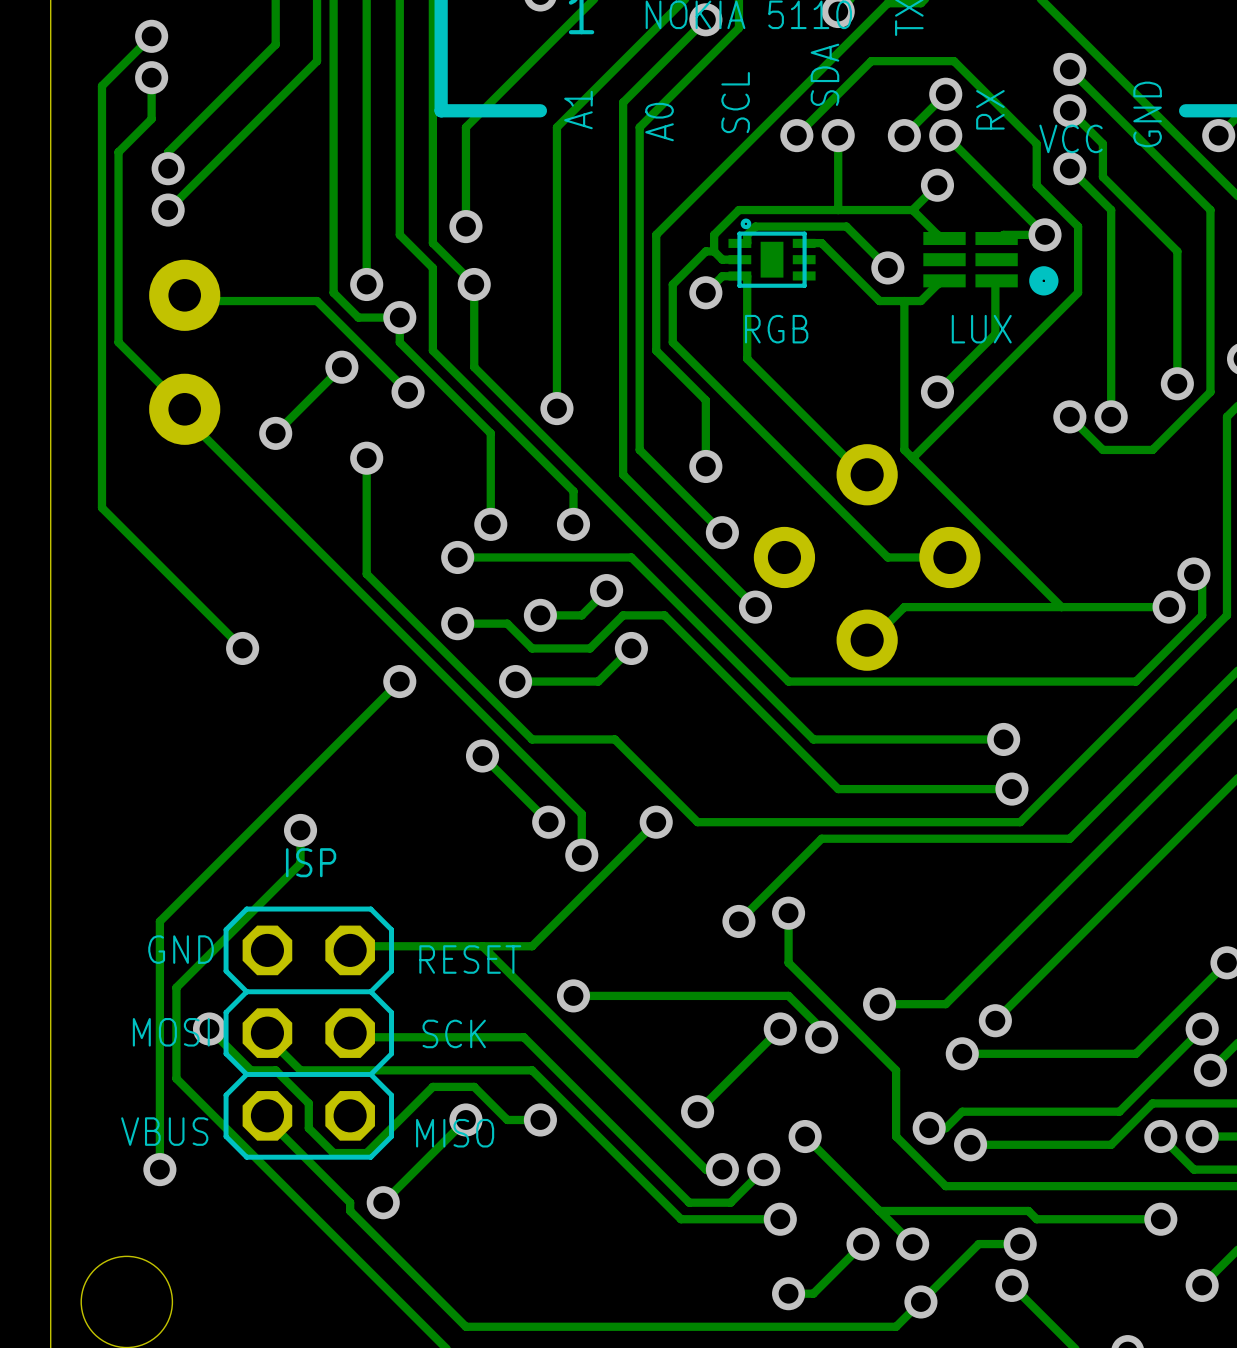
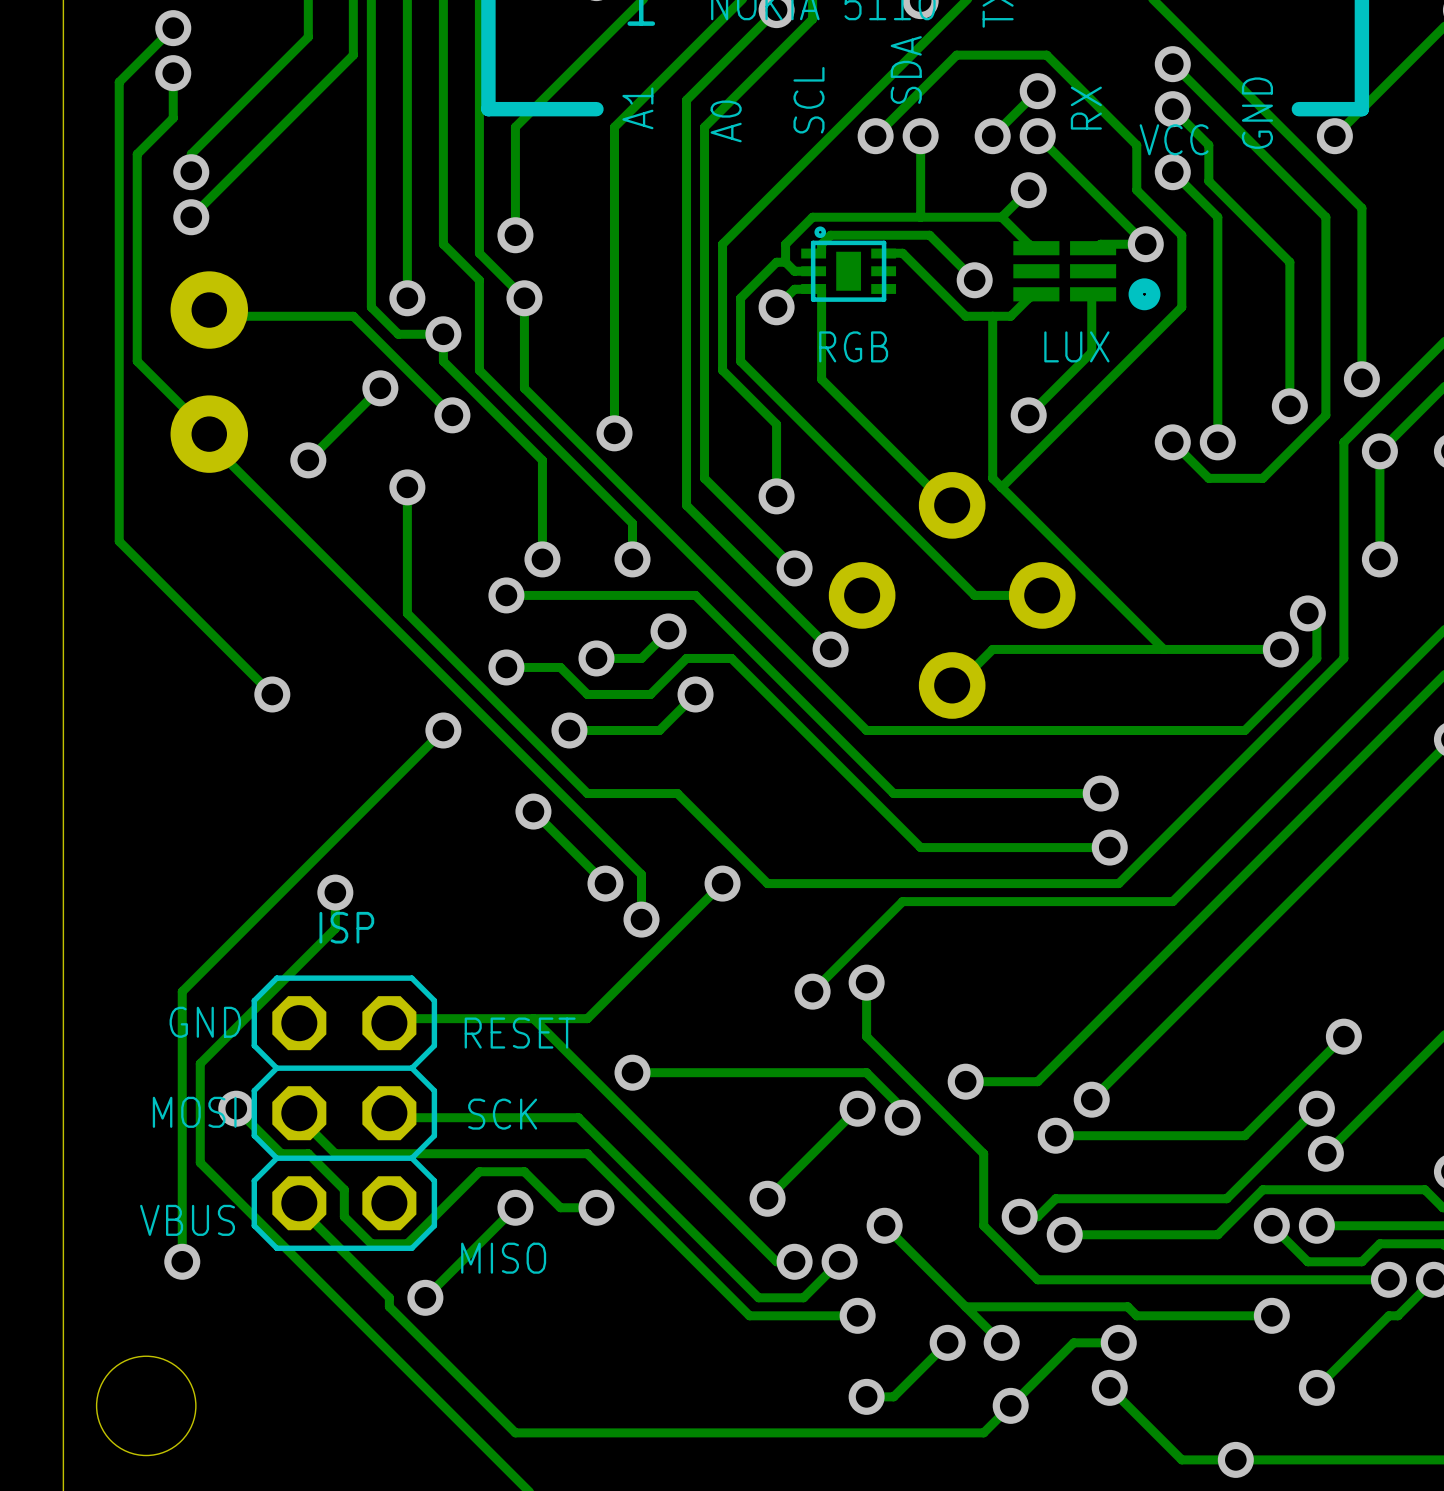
text position: MISO (455, 1133) -> MISO (503, 1258)

